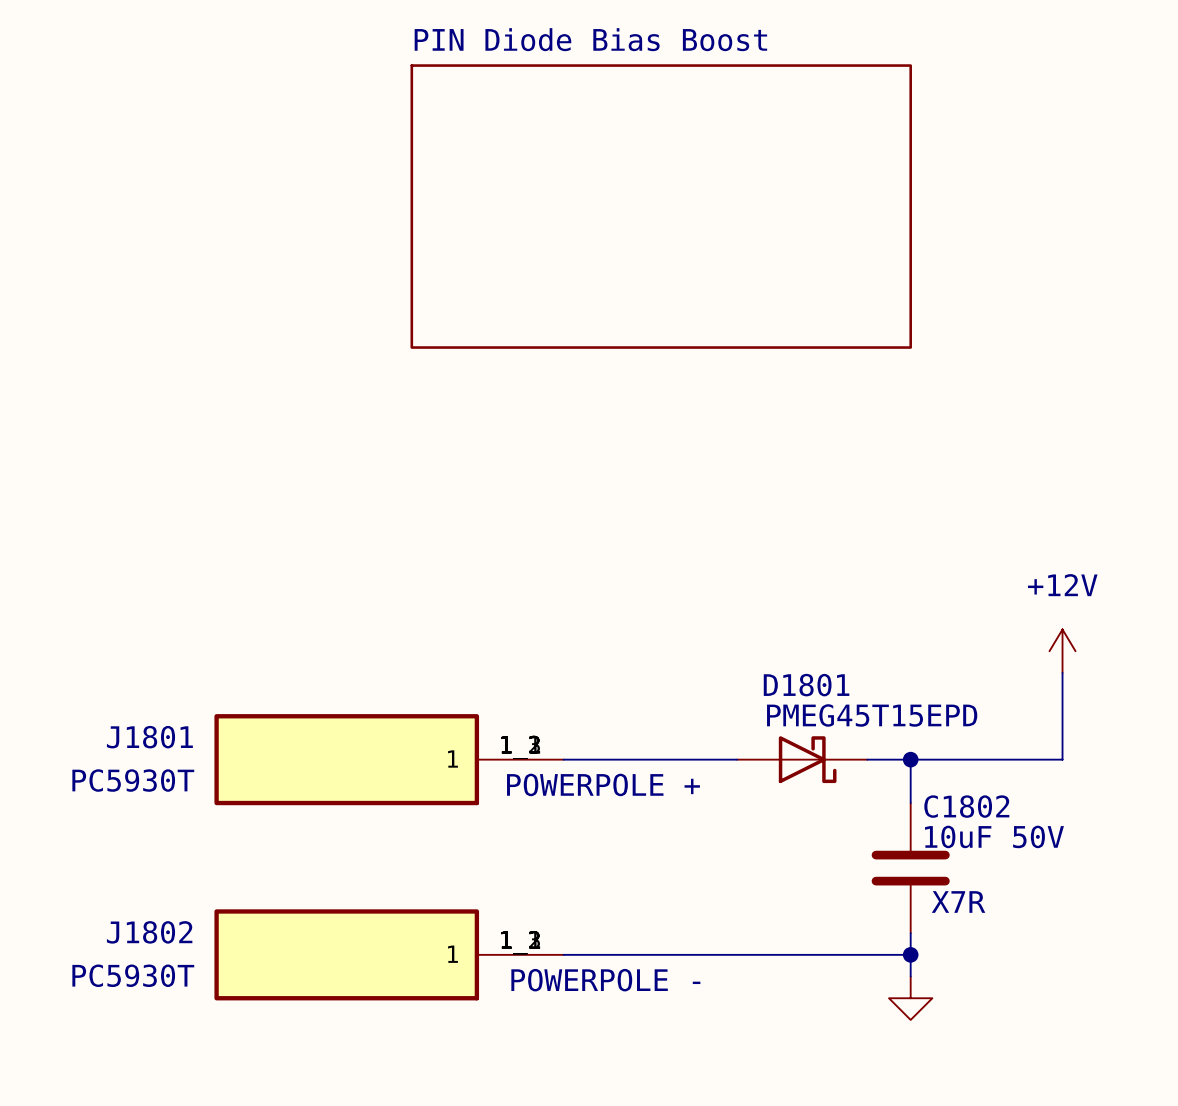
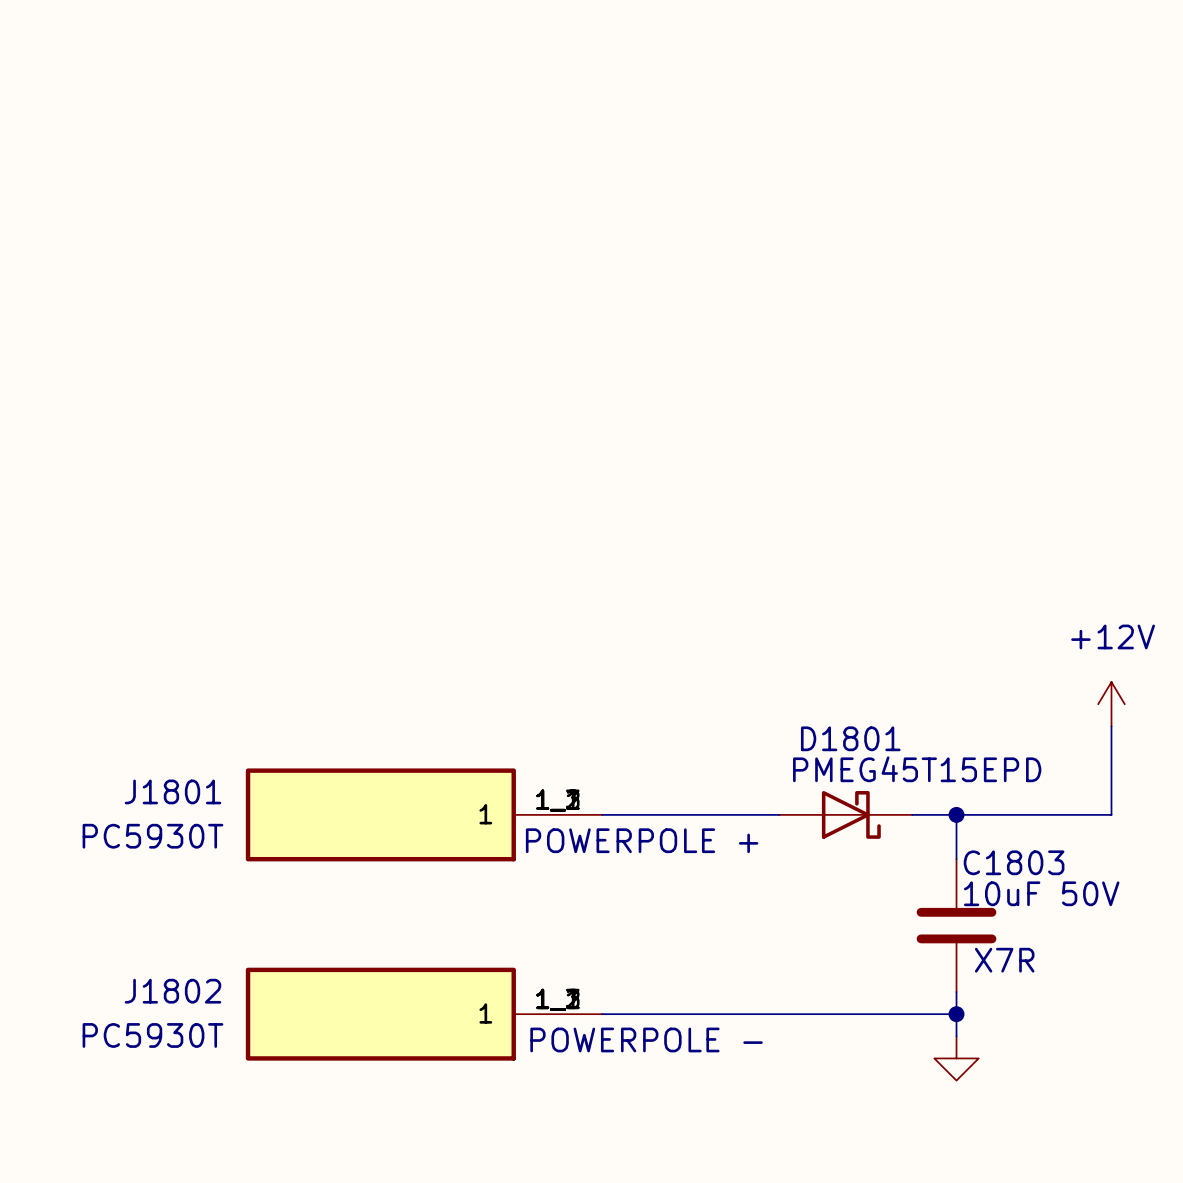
sheet PIN Diode Bias Boost: (661, 206) -> none
C1802 name: C1802 (966, 806) -> C1803 (1014, 862)

